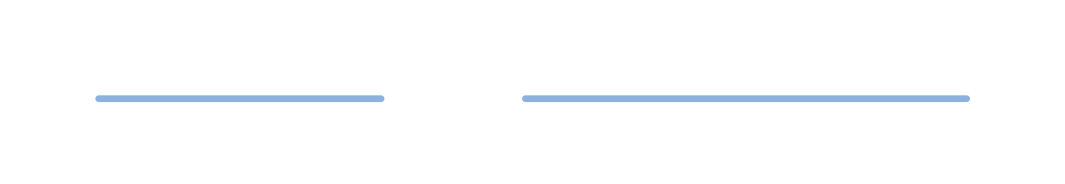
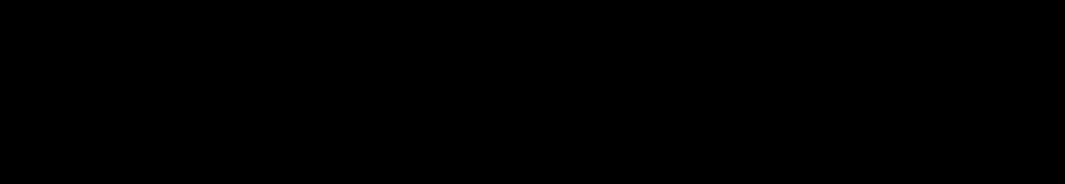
track: (381, 98) (98, 98) -> none
track: (966, 98) (525, 98) -> none

